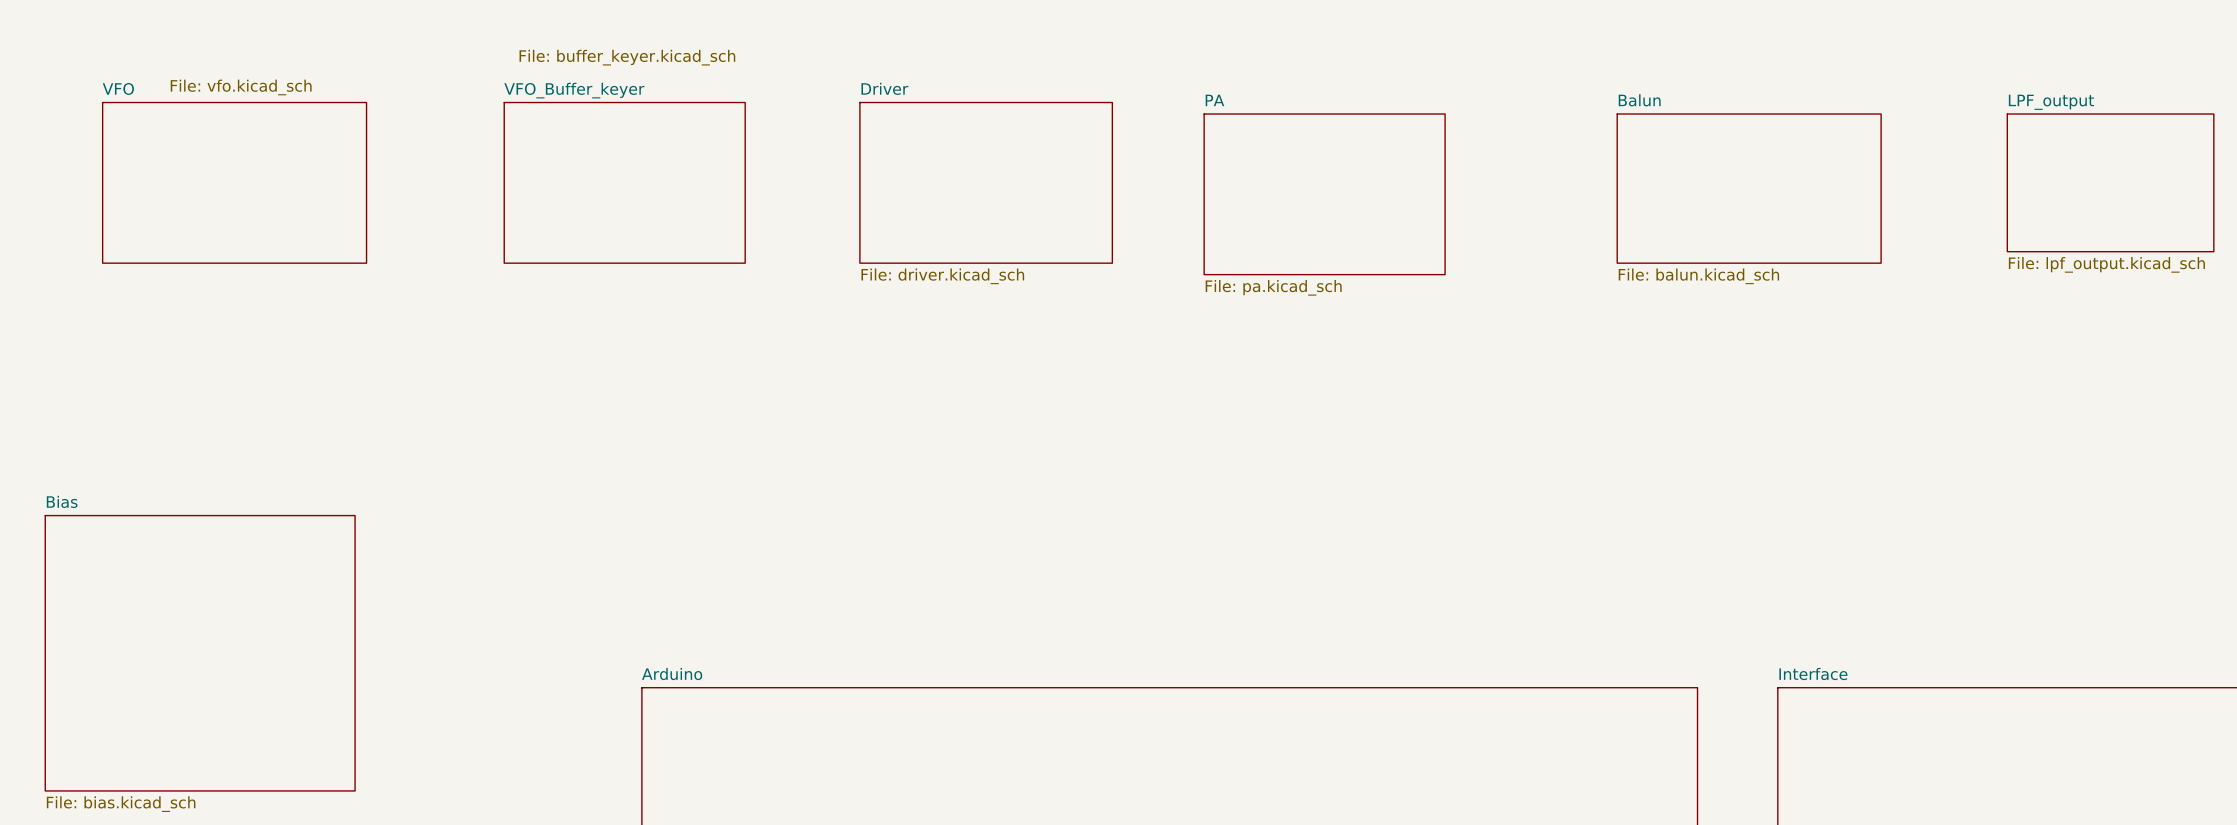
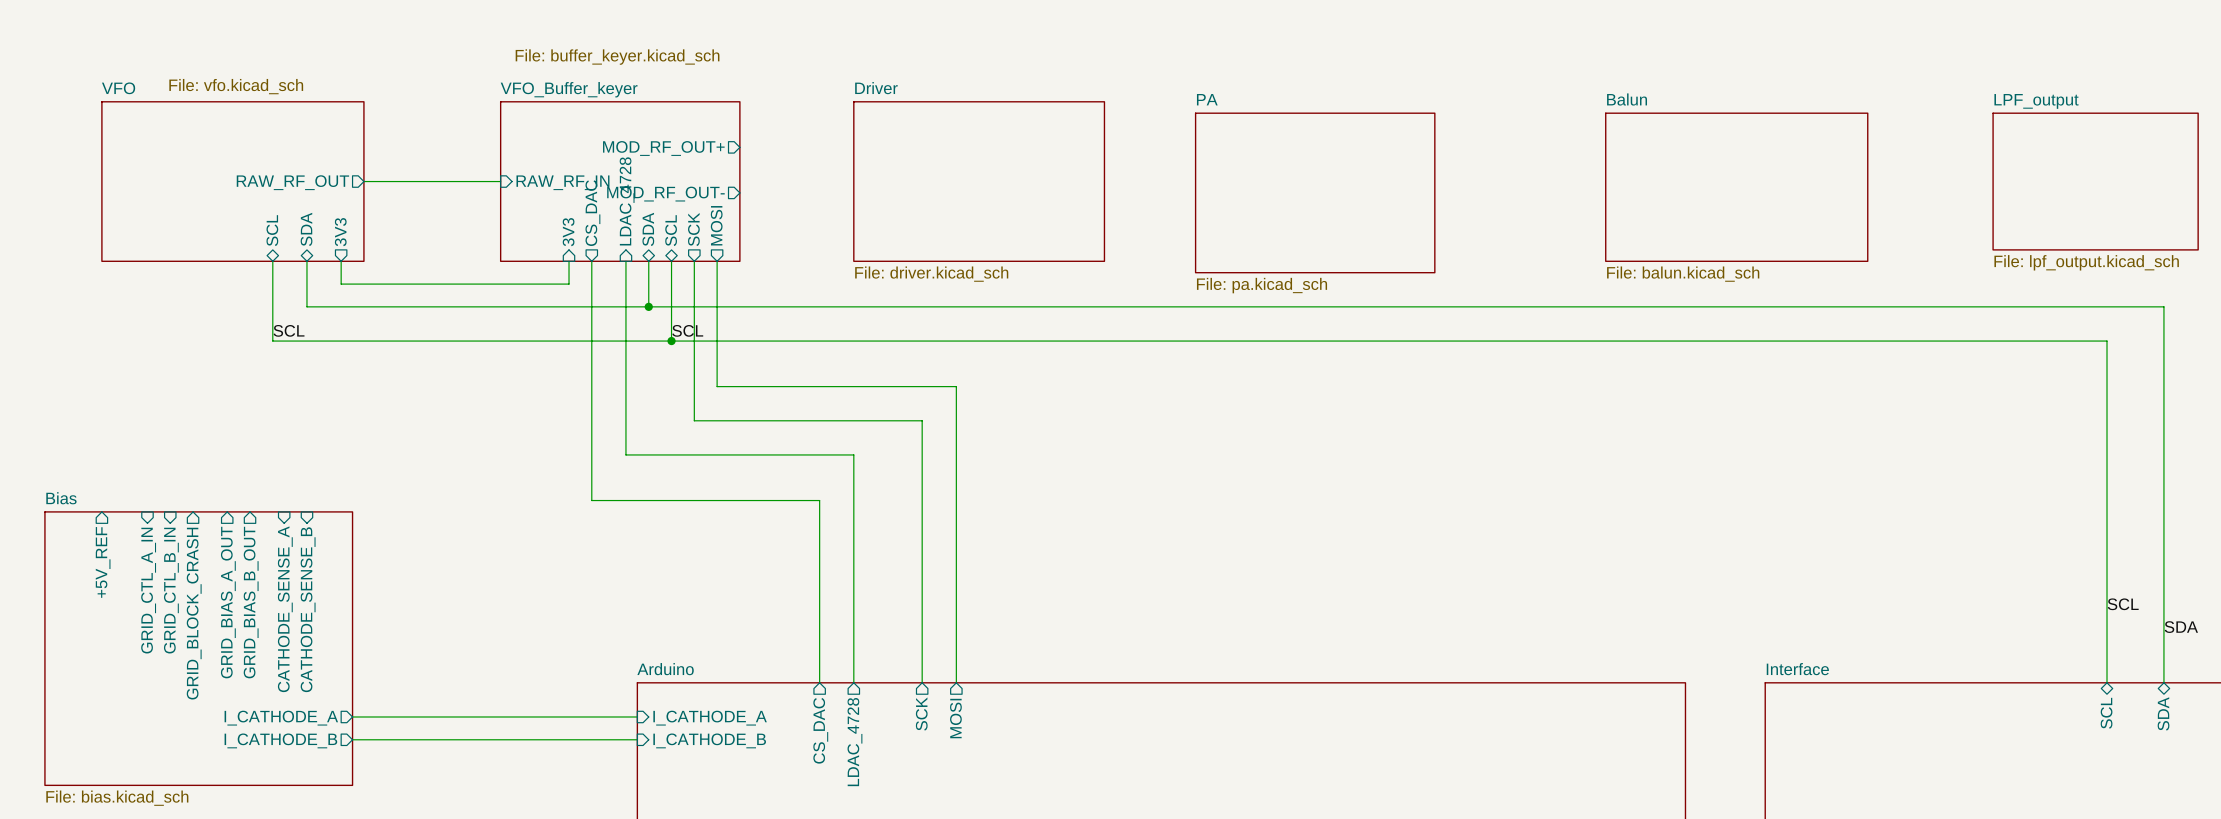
sheet pin: none -> MOD_RF_OUT+ (663, 148)
wire: none -> (363, 181) (500, 181)
sheet pin: none -> RAW_RF_OUT (292, 182)
sheet pin: none -> RAW_RF_IN (562, 182)
sheet pin: none -> MOD_RF_OUT- (665, 194)
sheet pin: none -> LDAC_4728 (627, 201)
sheet pin: none -> CS_DAC (592, 213)
sheet pin: none -> MOSI (716, 225)
sheet pin: none -> SDA (306, 229)
sheet pin: none -> SDA (648, 229)
sheet pin: none -> SCK (693, 229)
sheet pin: none -> SCL (272, 230)
sheet pin: none -> 3V3 (340, 232)
sheet pin: none -> 3V3 (568, 232)
sheet pin: none -> SCL (671, 230)
wire: none -> (272, 261) (272, 341) (2107, 341) (2107, 682)
wire: none -> (306, 261) (306, 306) (2163, 306) (2163, 682)
wire: none -> (341, 261) (341, 284) (569, 284) (569, 261)
wire: none -> (591, 261) (591, 500) (819, 500) (819, 682)
wire: none -> (625, 261) (625, 454) (853, 454) (853, 682)
wire: none -> (648, 261) (648, 306)
wire: none -> (671, 261) (671, 341)
wire: none -> (694, 261) (694, 420) (922, 420) (922, 682)
wire: none -> (717, 261) (717, 386) (956, 386) (956, 682)
junction: none -> (648, 306)
label: none -> SCL (289, 330)
label: none -> SCL (687, 330)
junction: none -> (671, 341)
sheet pin: none -> +5V_REF (103, 562)
sheet pin: none -> GRID_CTL_A_IN (148, 590)
sheet pin: none -> GRID_CTL_B_IN (171, 590)
sheet pin: none -> GRID_BIAS_A_OUT (228, 602)
sheet pin: none -> GRID_BIAS_B_OUT (251, 602)
sheet pin: none -> CATHODE_SENSE_A (285, 609)
sheet pin: none -> CATHODE_SENSE_B (308, 609)
label: none -> SCL (2123, 604)
sheet pin: none -> GRID_BLOCK_CRASH (194, 613)
label: none -> SDA (2181, 627)
sheet pin: none -> SCL (2106, 713)
sheet pin: none -> SCK (921, 714)
sheet pin: none -> SDA (2163, 713)
wire: none -> (352, 716) (637, 716)
sheet pin: none -> MOSI (955, 718)
sheet pin: none -> I_CATHODE_A (281, 718)
sheet pin: none -> I_CATHODE_A (710, 718)
sheet pin: none -> CS_DAC (820, 730)
wire: none -> (352, 739) (637, 739)
sheet pin: none -> I_CATHODE_B (280, 740)
sheet pin: none -> I_CATHODE_B (709, 740)
sheet pin: none -> LDAC_4728 (854, 742)

